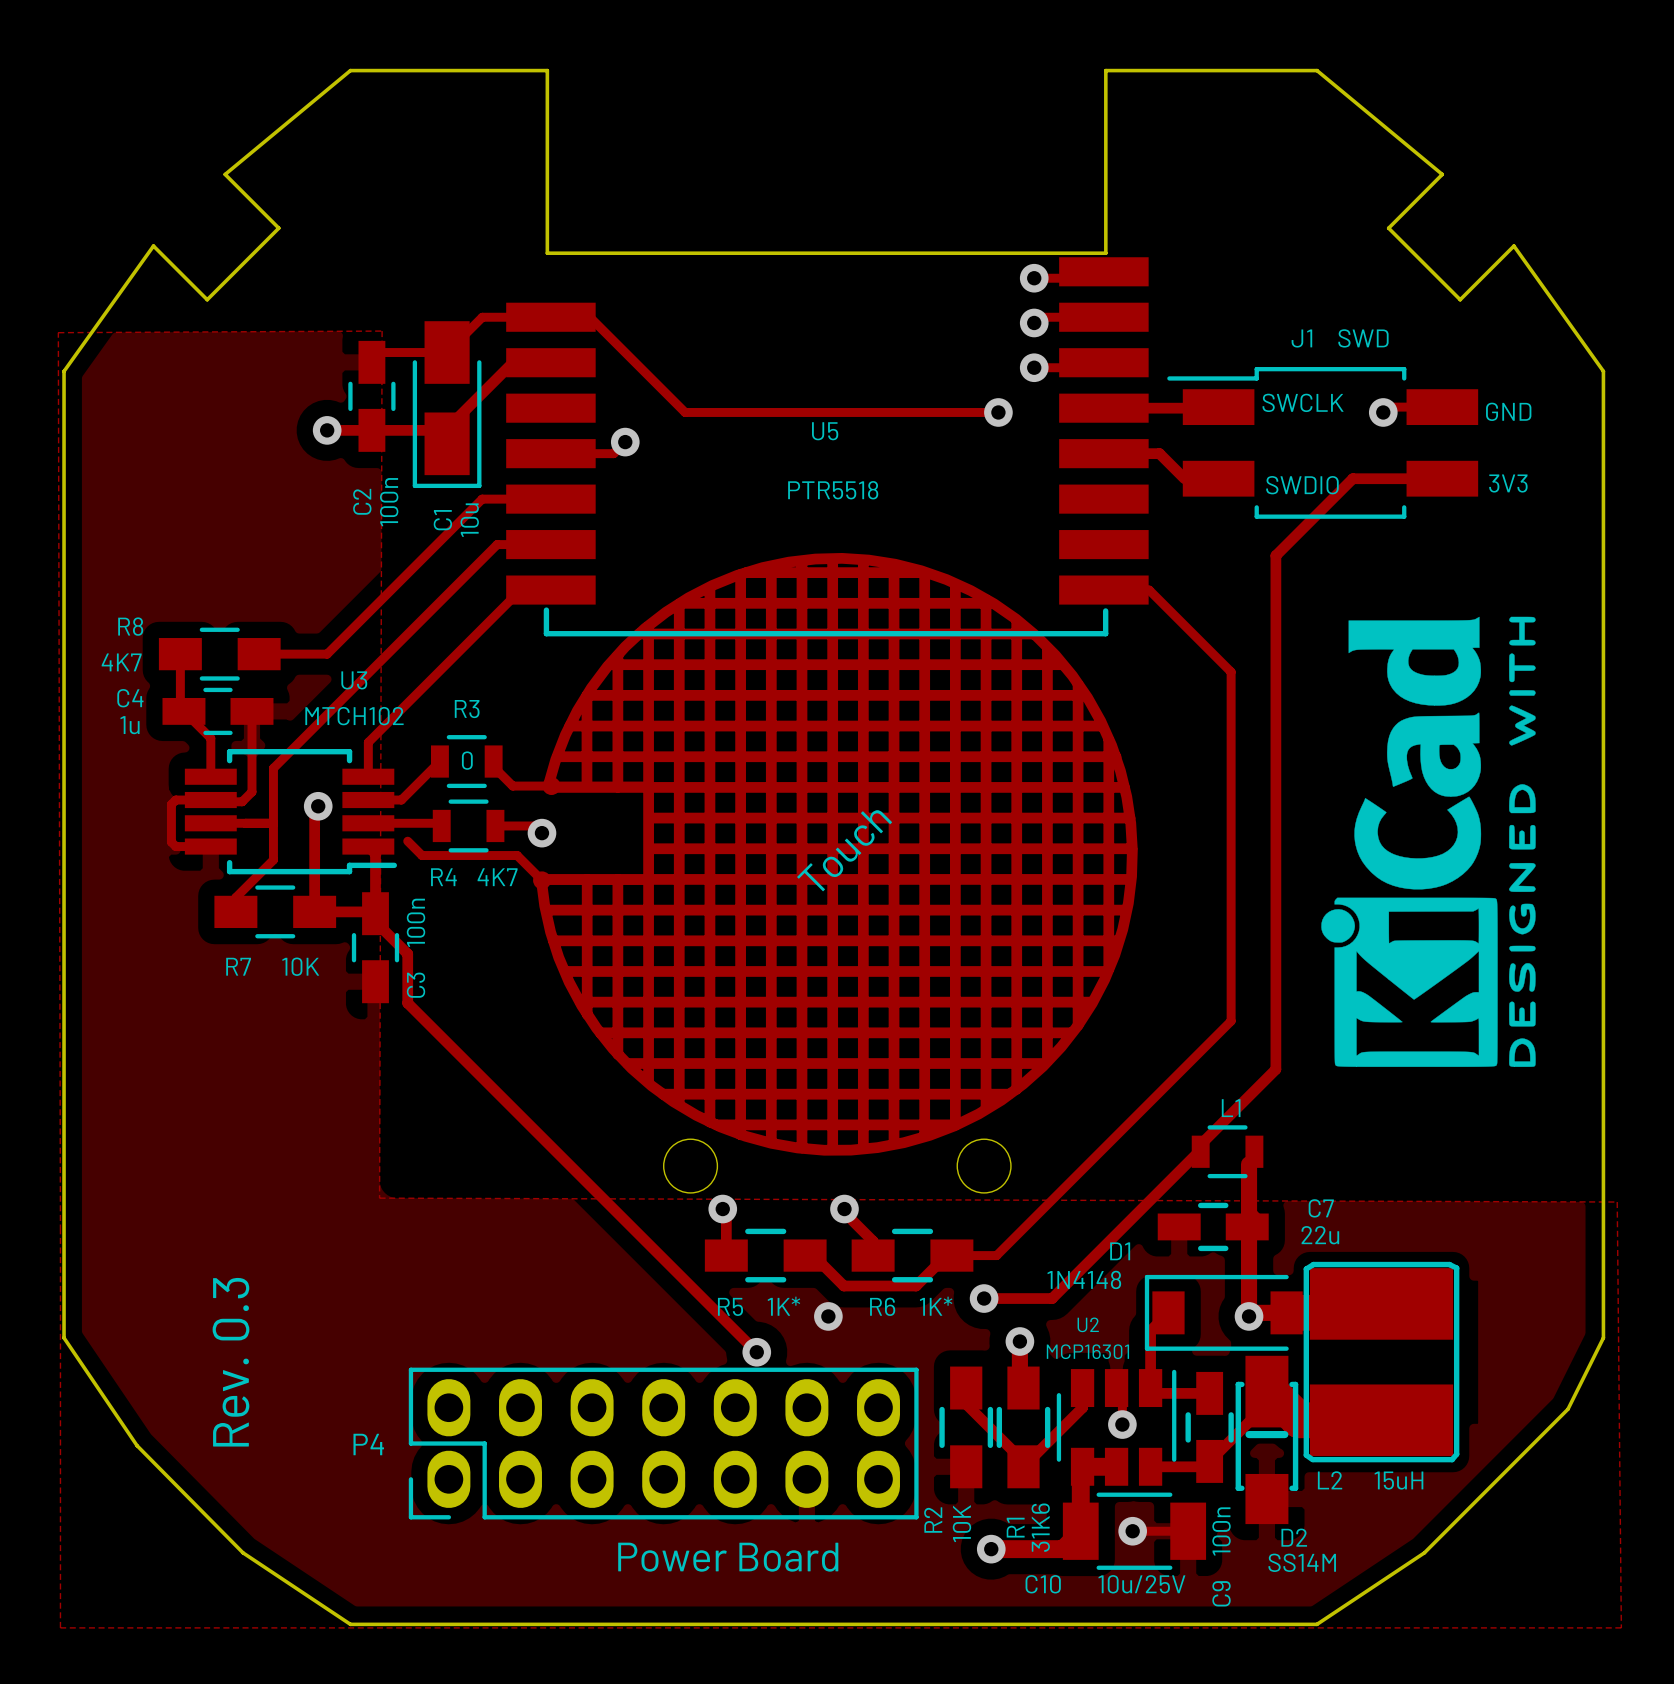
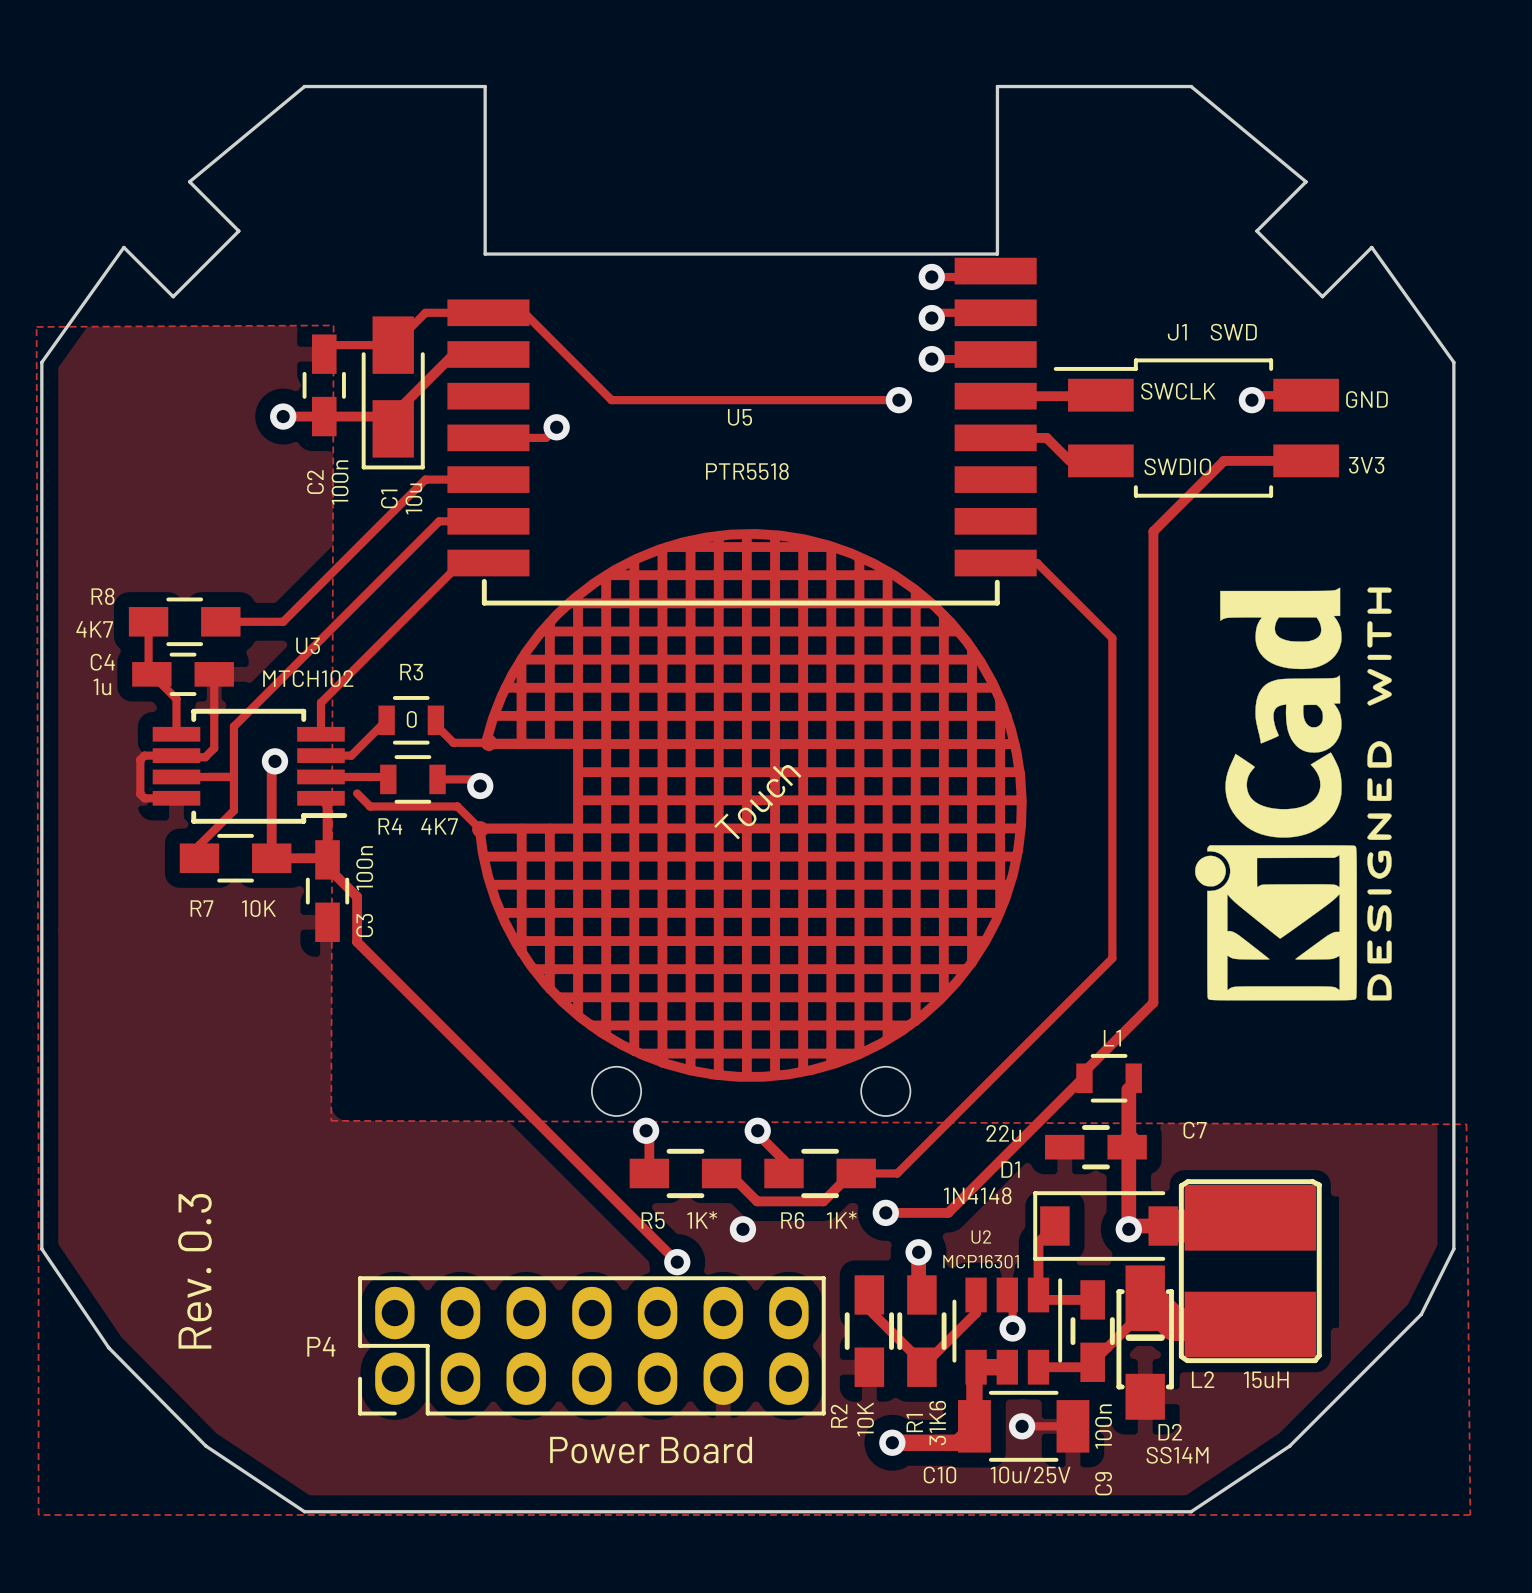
C7 value position: 22u (1320, 1235) -> 22u (1003, 1133)

